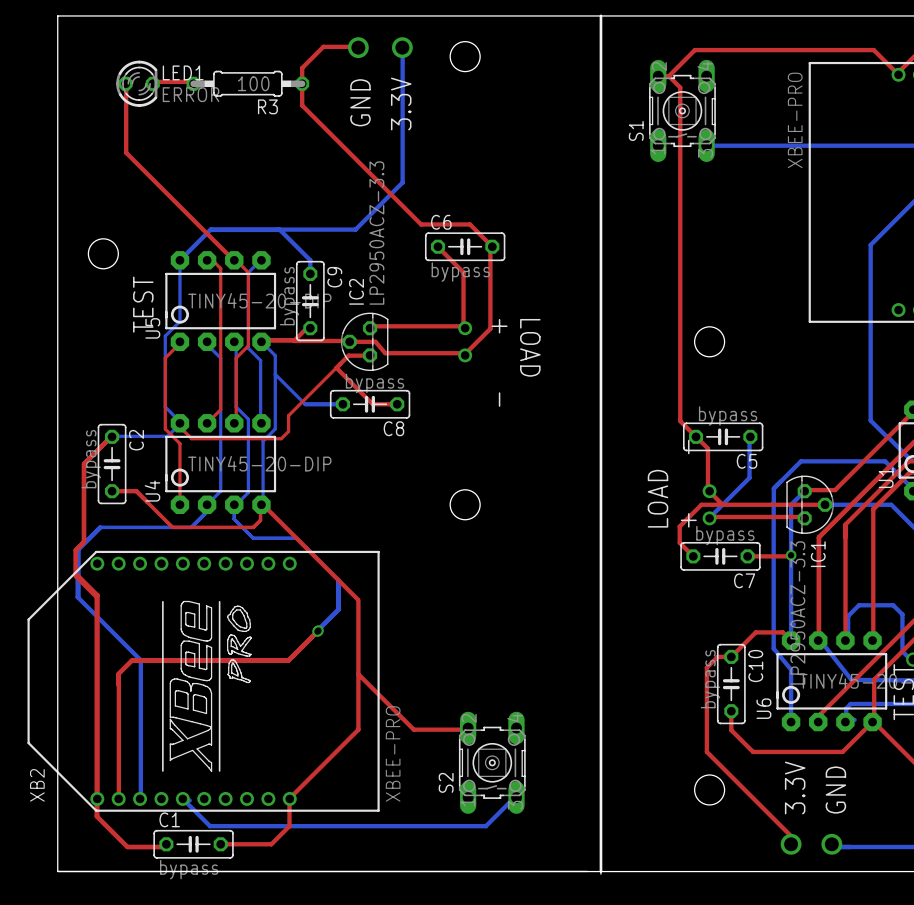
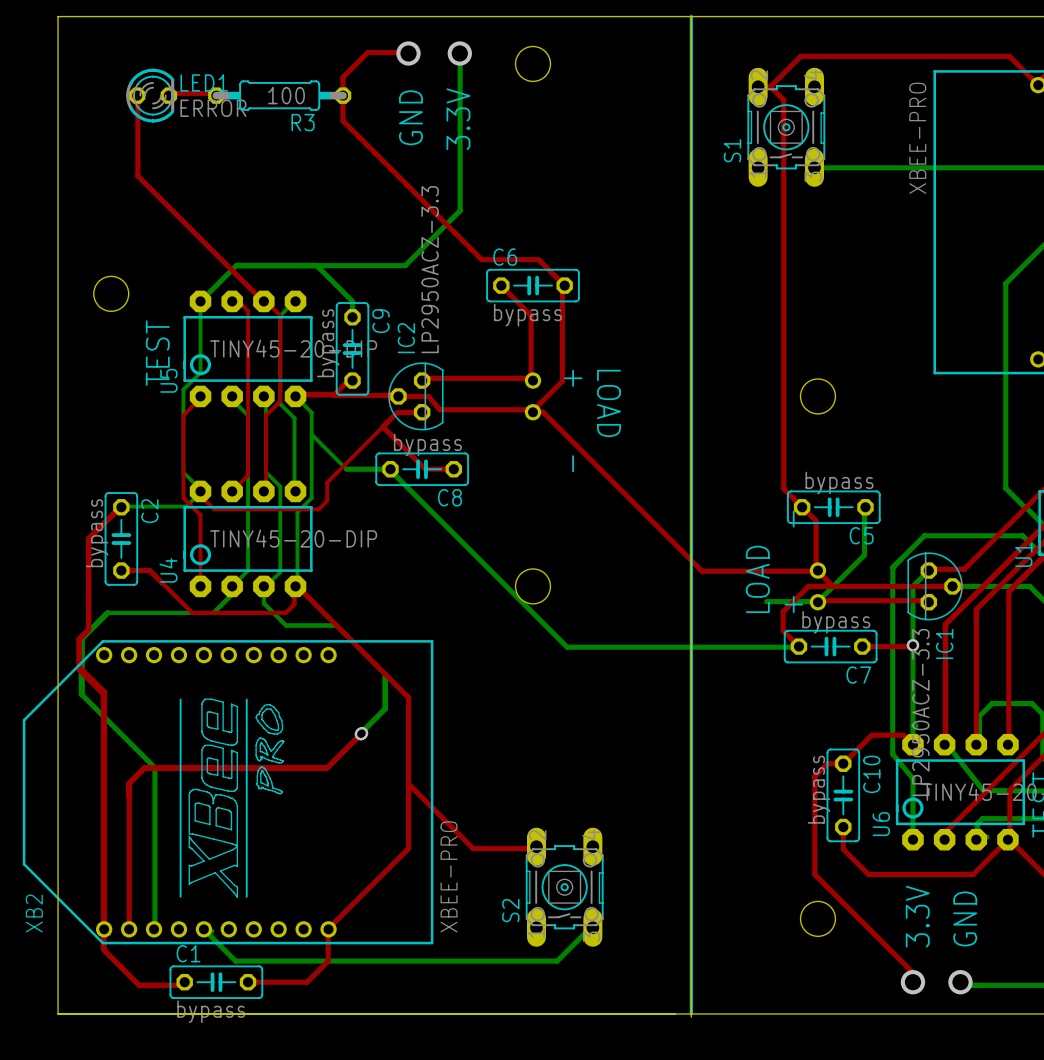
top track: none -> (542, 411) (702, 571) (821, 571)
bottom track: none -> (388, 468) (567, 647) (798, 647)
bottom track: none -> (766, 601) (816, 601)

